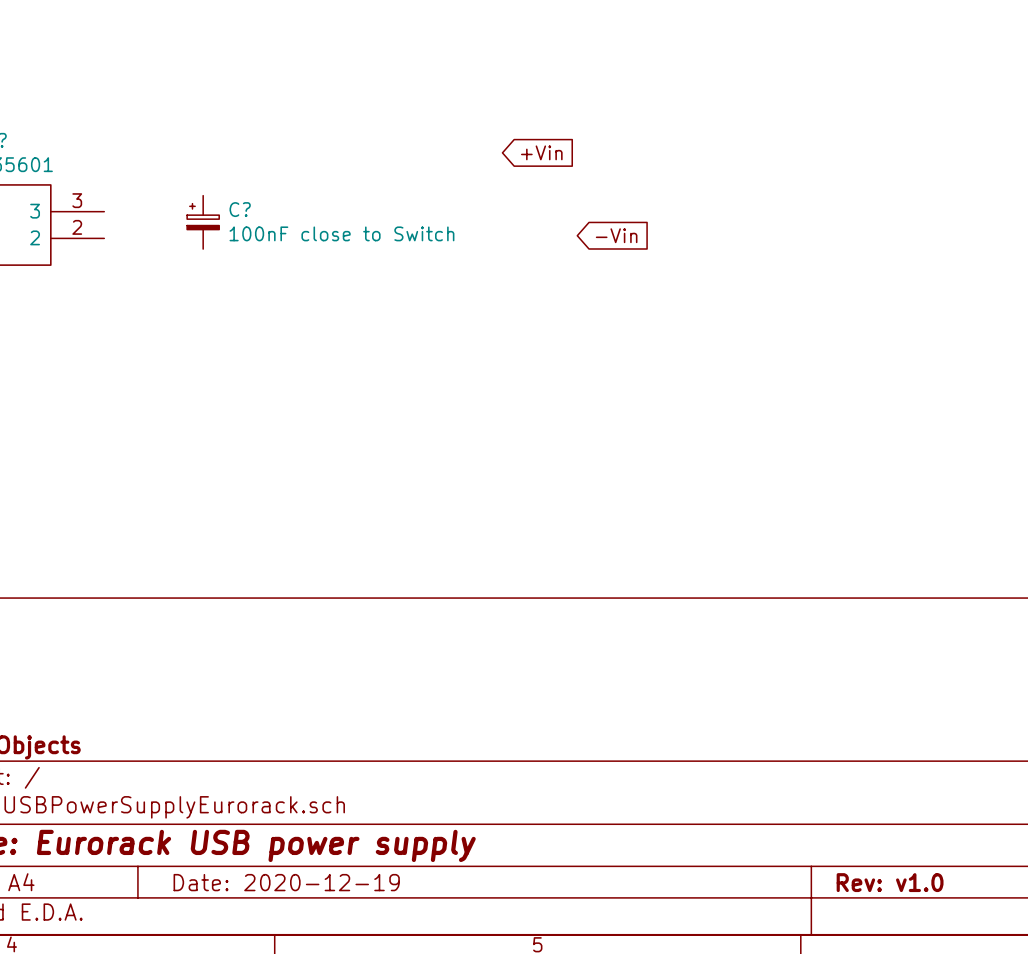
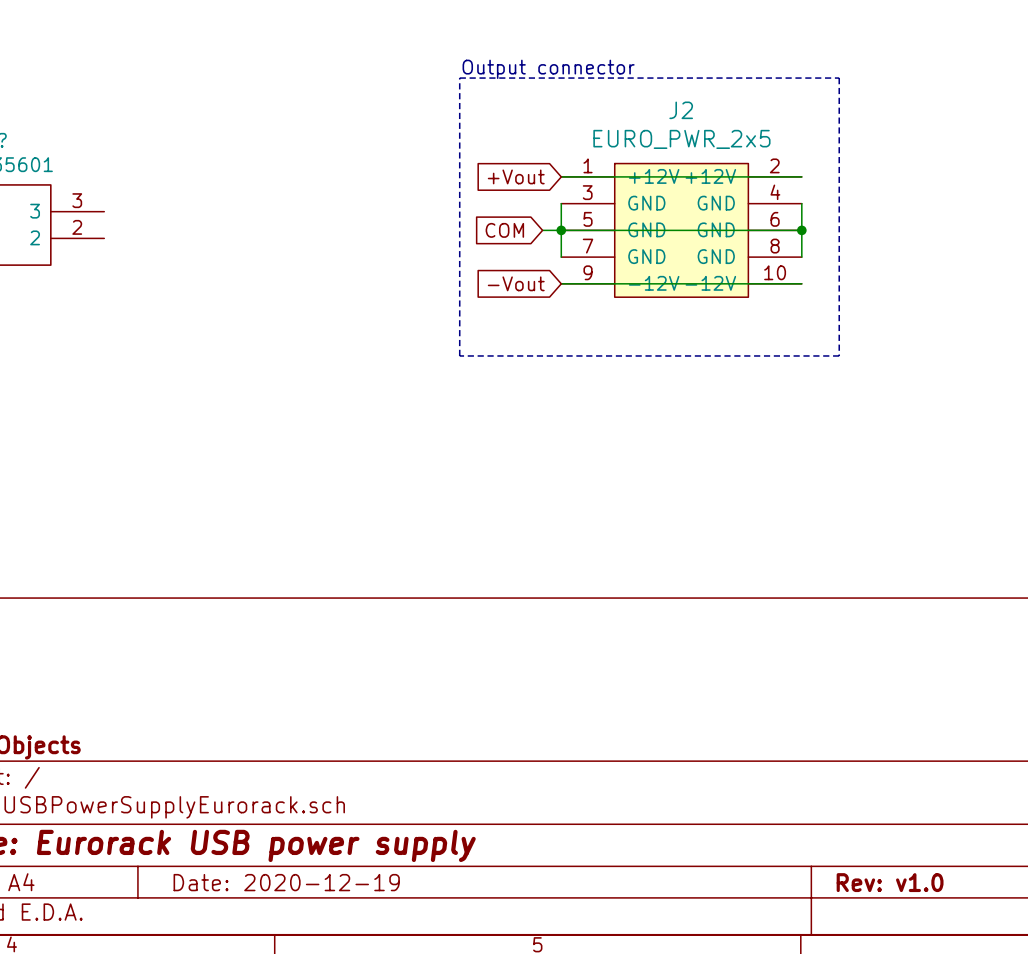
text: none -> Output connector (548, 69)
line: none -> (459, 78) (839, 78) (839, 355) (459, 355) (459, 78)
global label: +Vin (541, 152) -> none
global label: none -> +Vout (516, 176)
wire: none -> (561, 176) (801, 176)
wire: none -> (561, 203) (561, 257)
wire: none -> (801, 203) (801, 257)
C?: 100nF close to Switch (203, 222) -> none
global label: none -> COM (504, 230)
wire: none -> (542, 230) (801, 230)
junction: none -> (561, 230)
J2: none -> EURO_PWR_2x5 (681, 230)
junction: none -> (801, 230)
global label: -Vin (616, 235) -> none
global label: none -> -Vout (516, 283)
wire: none -> (561, 283) (801, 283)

